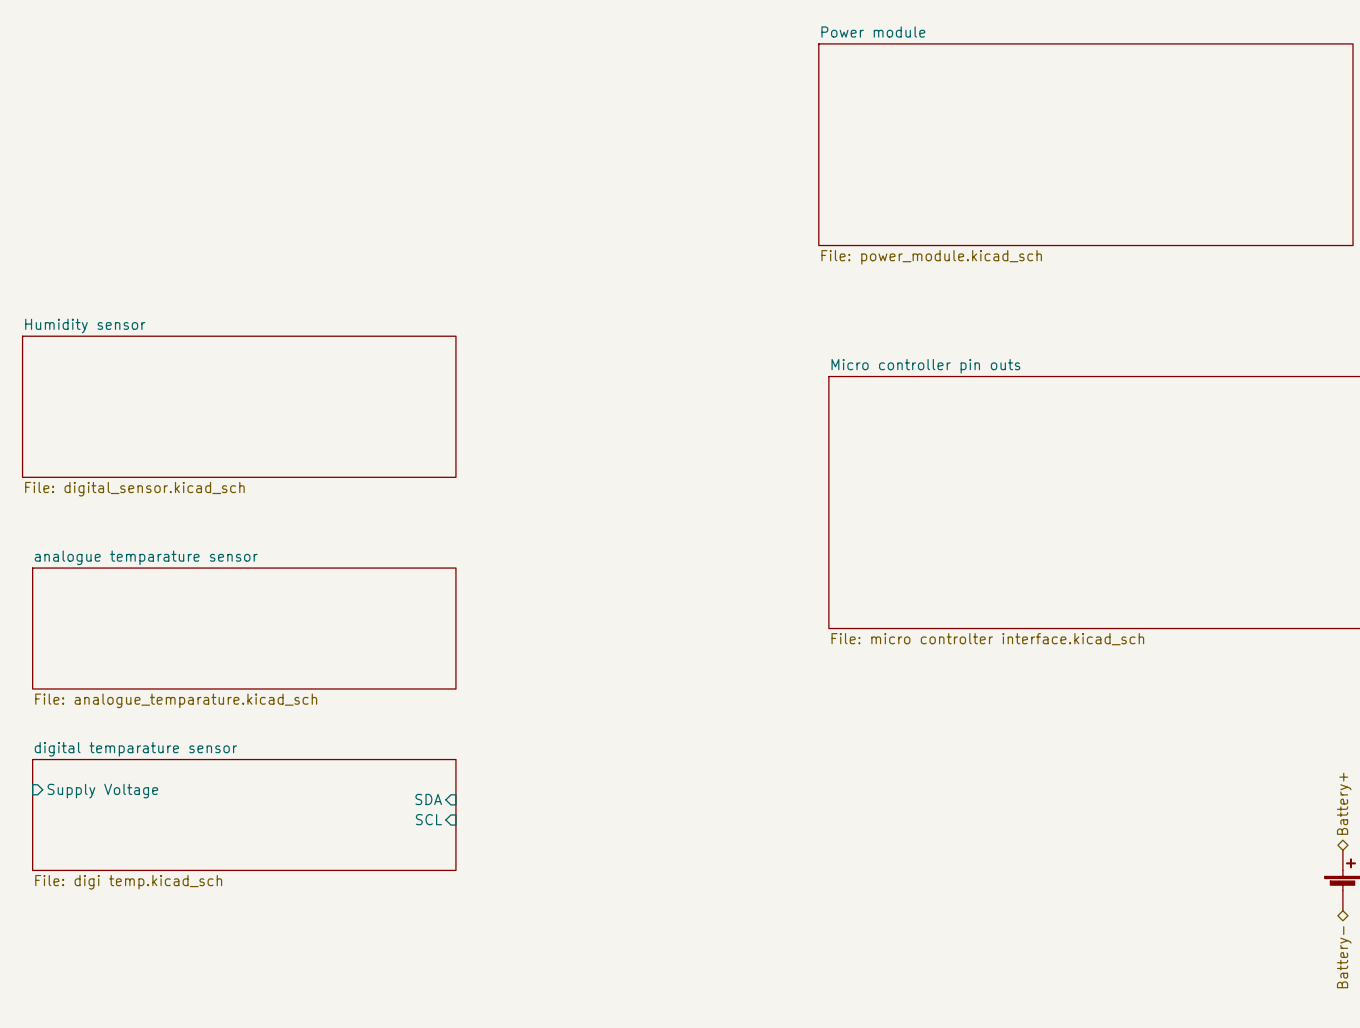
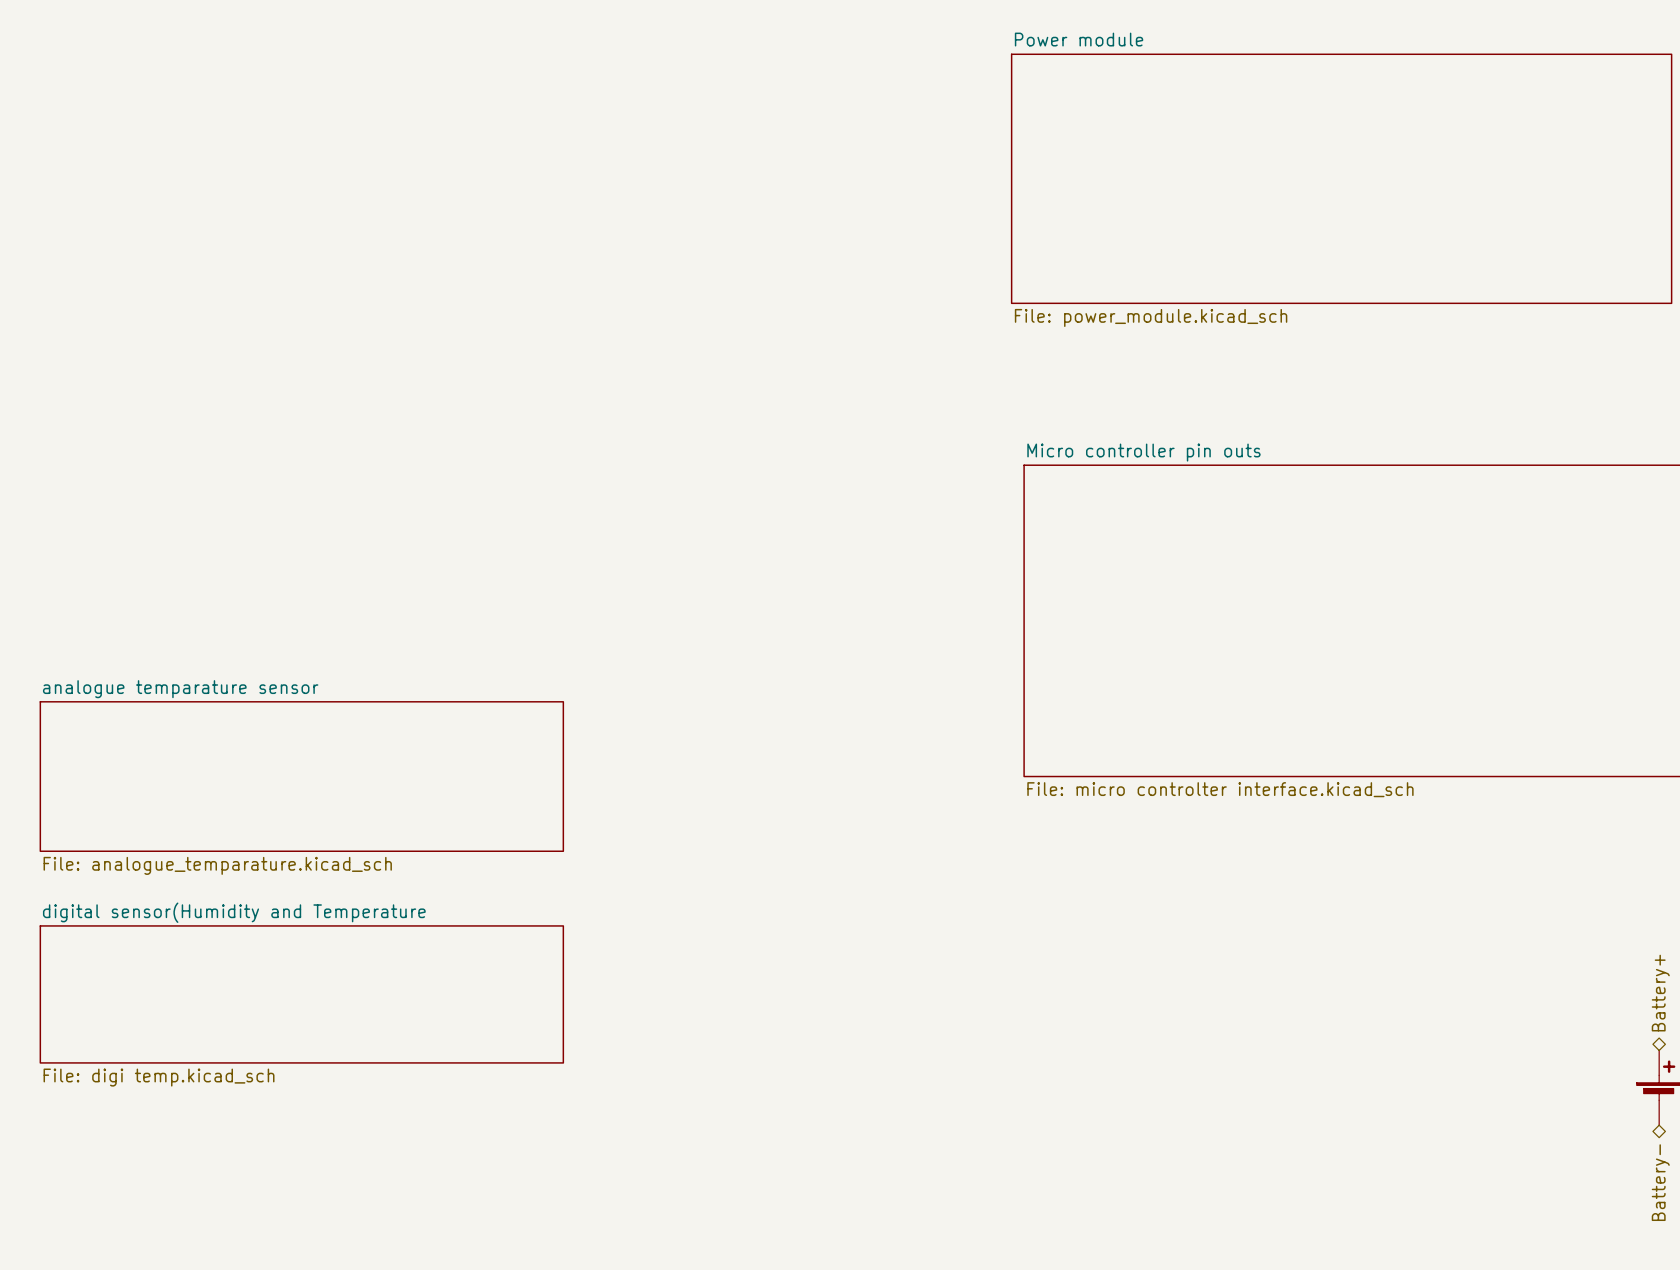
sheet Humidity sensor: File: digital_sensor.kicad_sch (239, 406) -> none
sheet pin: Supply Voltage (102, 791) -> none
sheet pin: SDA (428, 799) -> none
sheet digital sensor(Humidity and Temperature: none -> File: digi temp.kicad_sch (301, 994)
sheet digital temparature sensor: File: digi temp.kicad_sch (244, 814) -> none
sheet pin: SCL (428, 819) -> none

